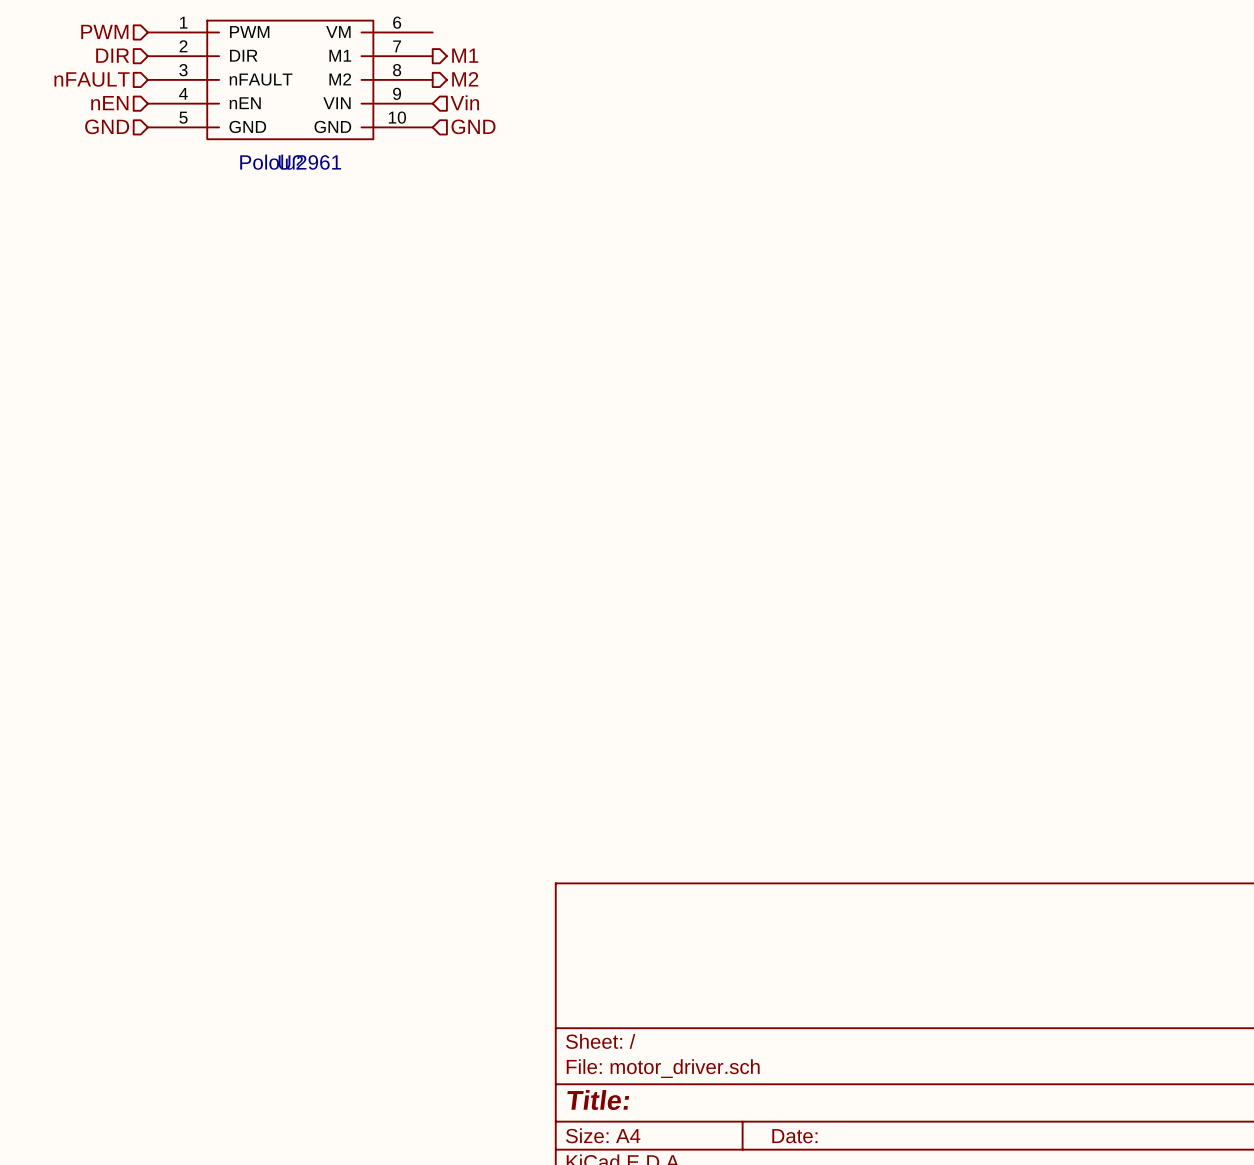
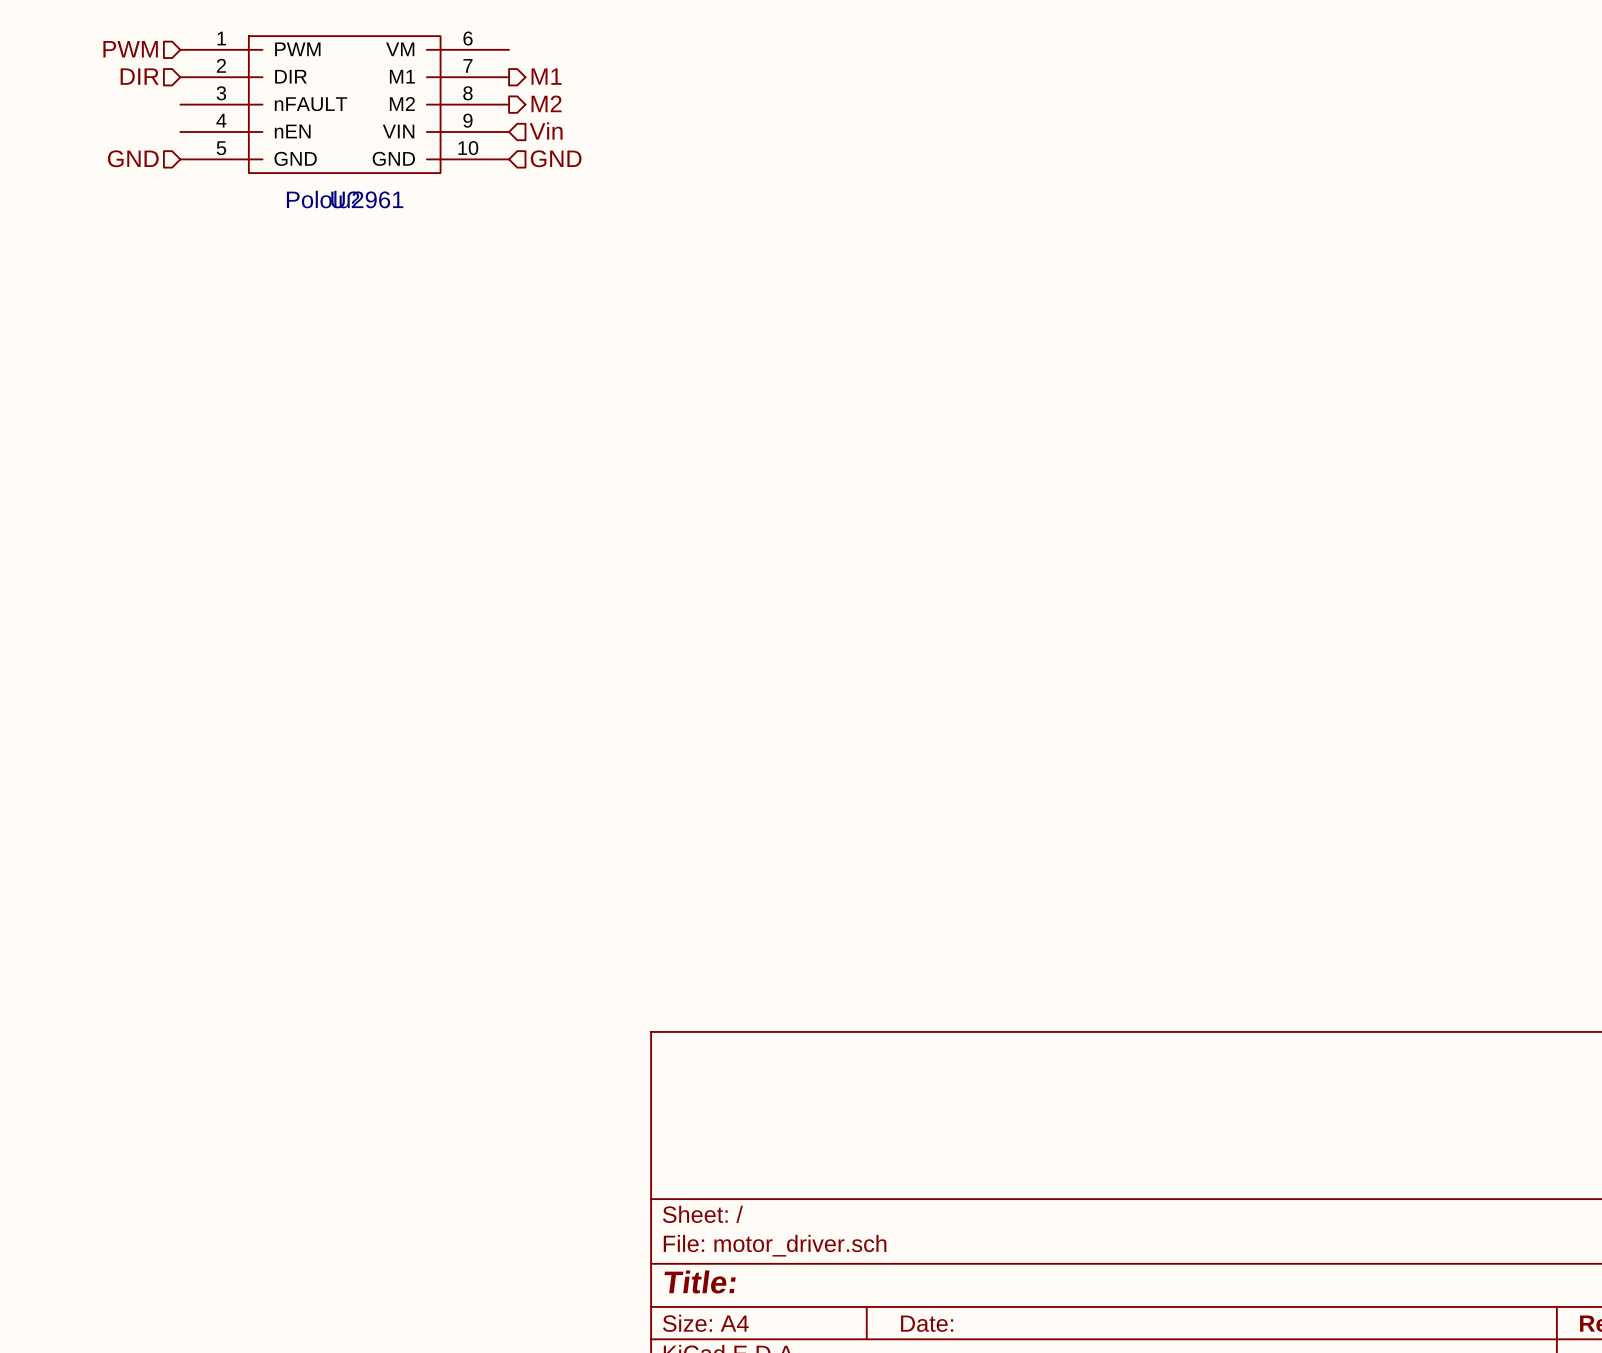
hierarchical label: nFAULT (92, 79) -> none
hierarchical label: nEN (109, 103) -> none

